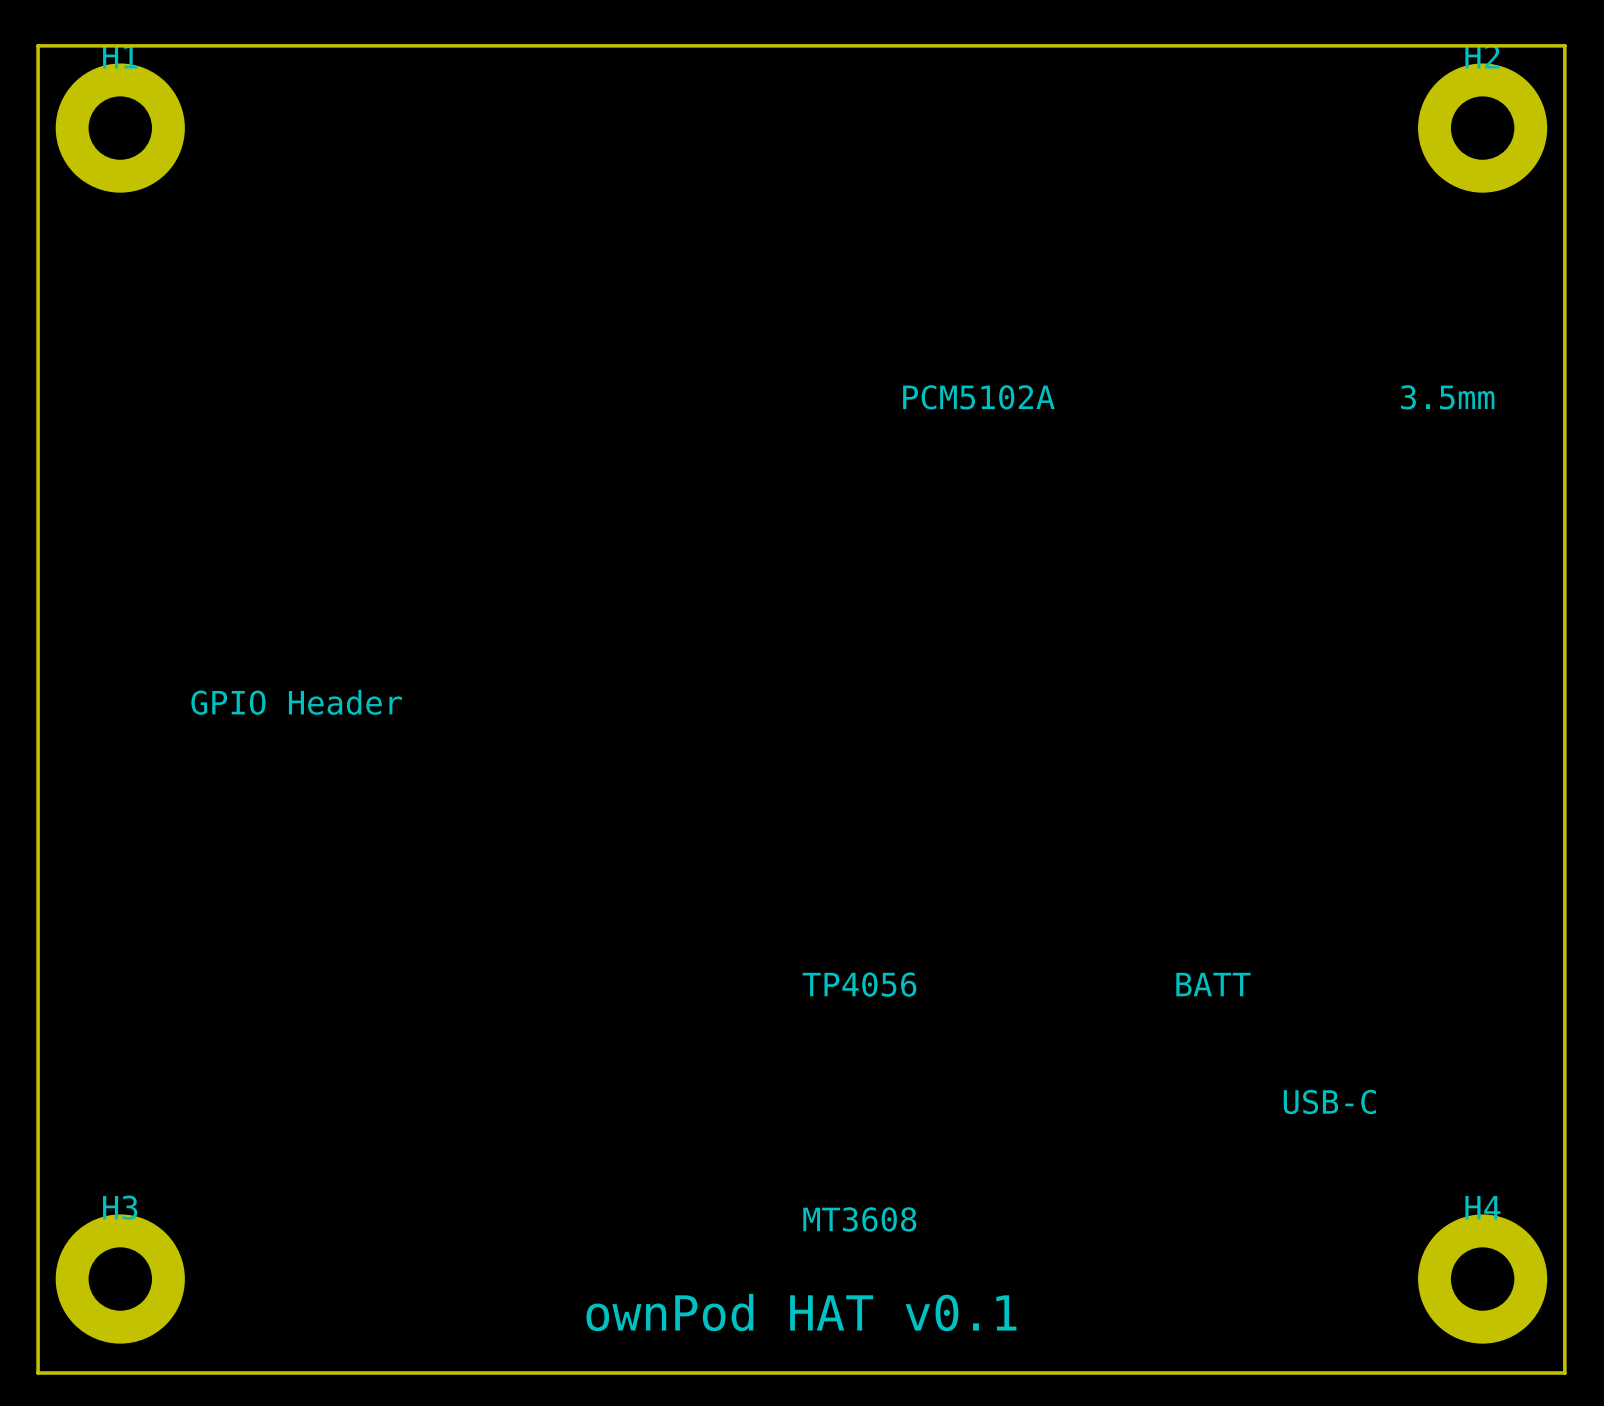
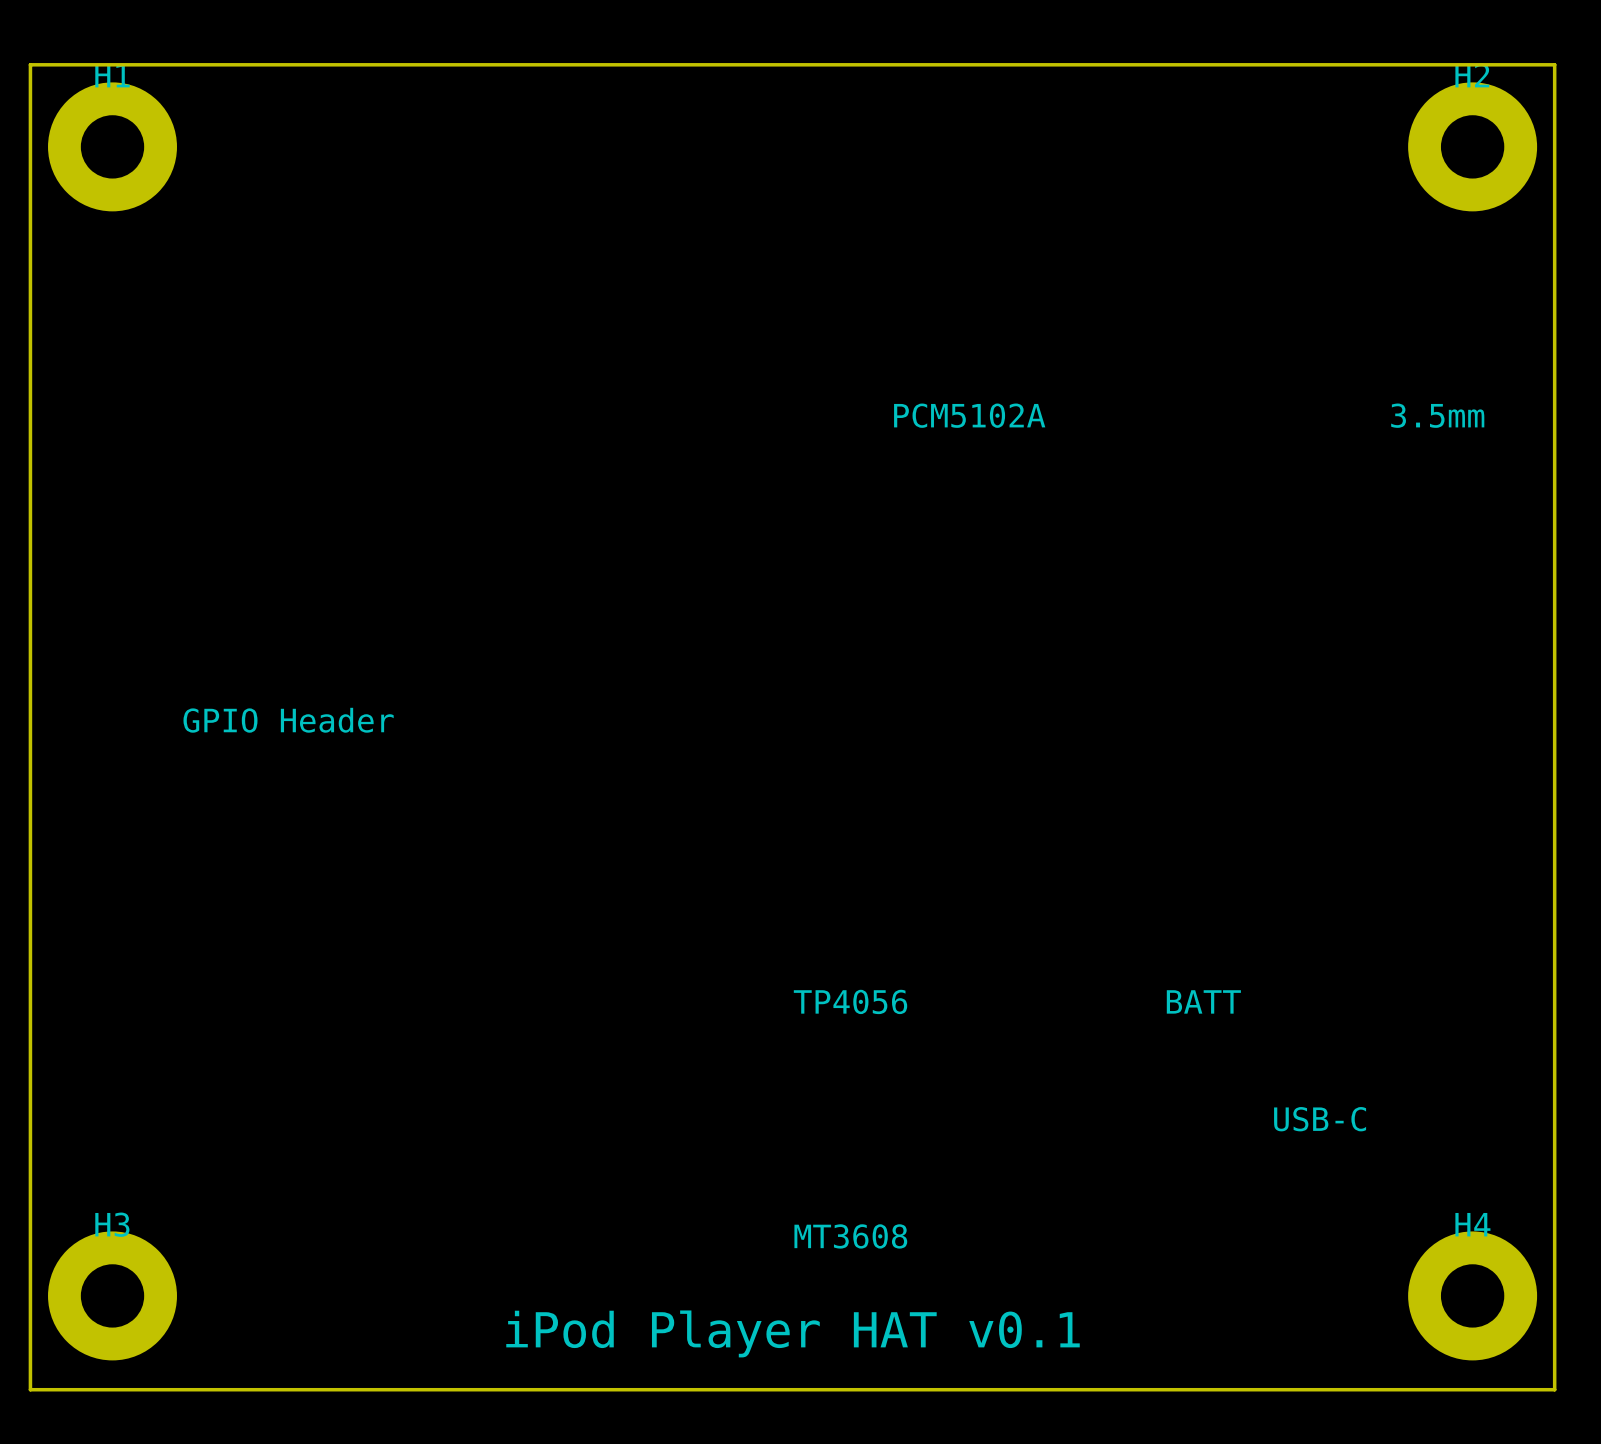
text: ownPod HAT v0.1 (801, 1312) -> iPod Player HAT v0.1 (793, 1333)

